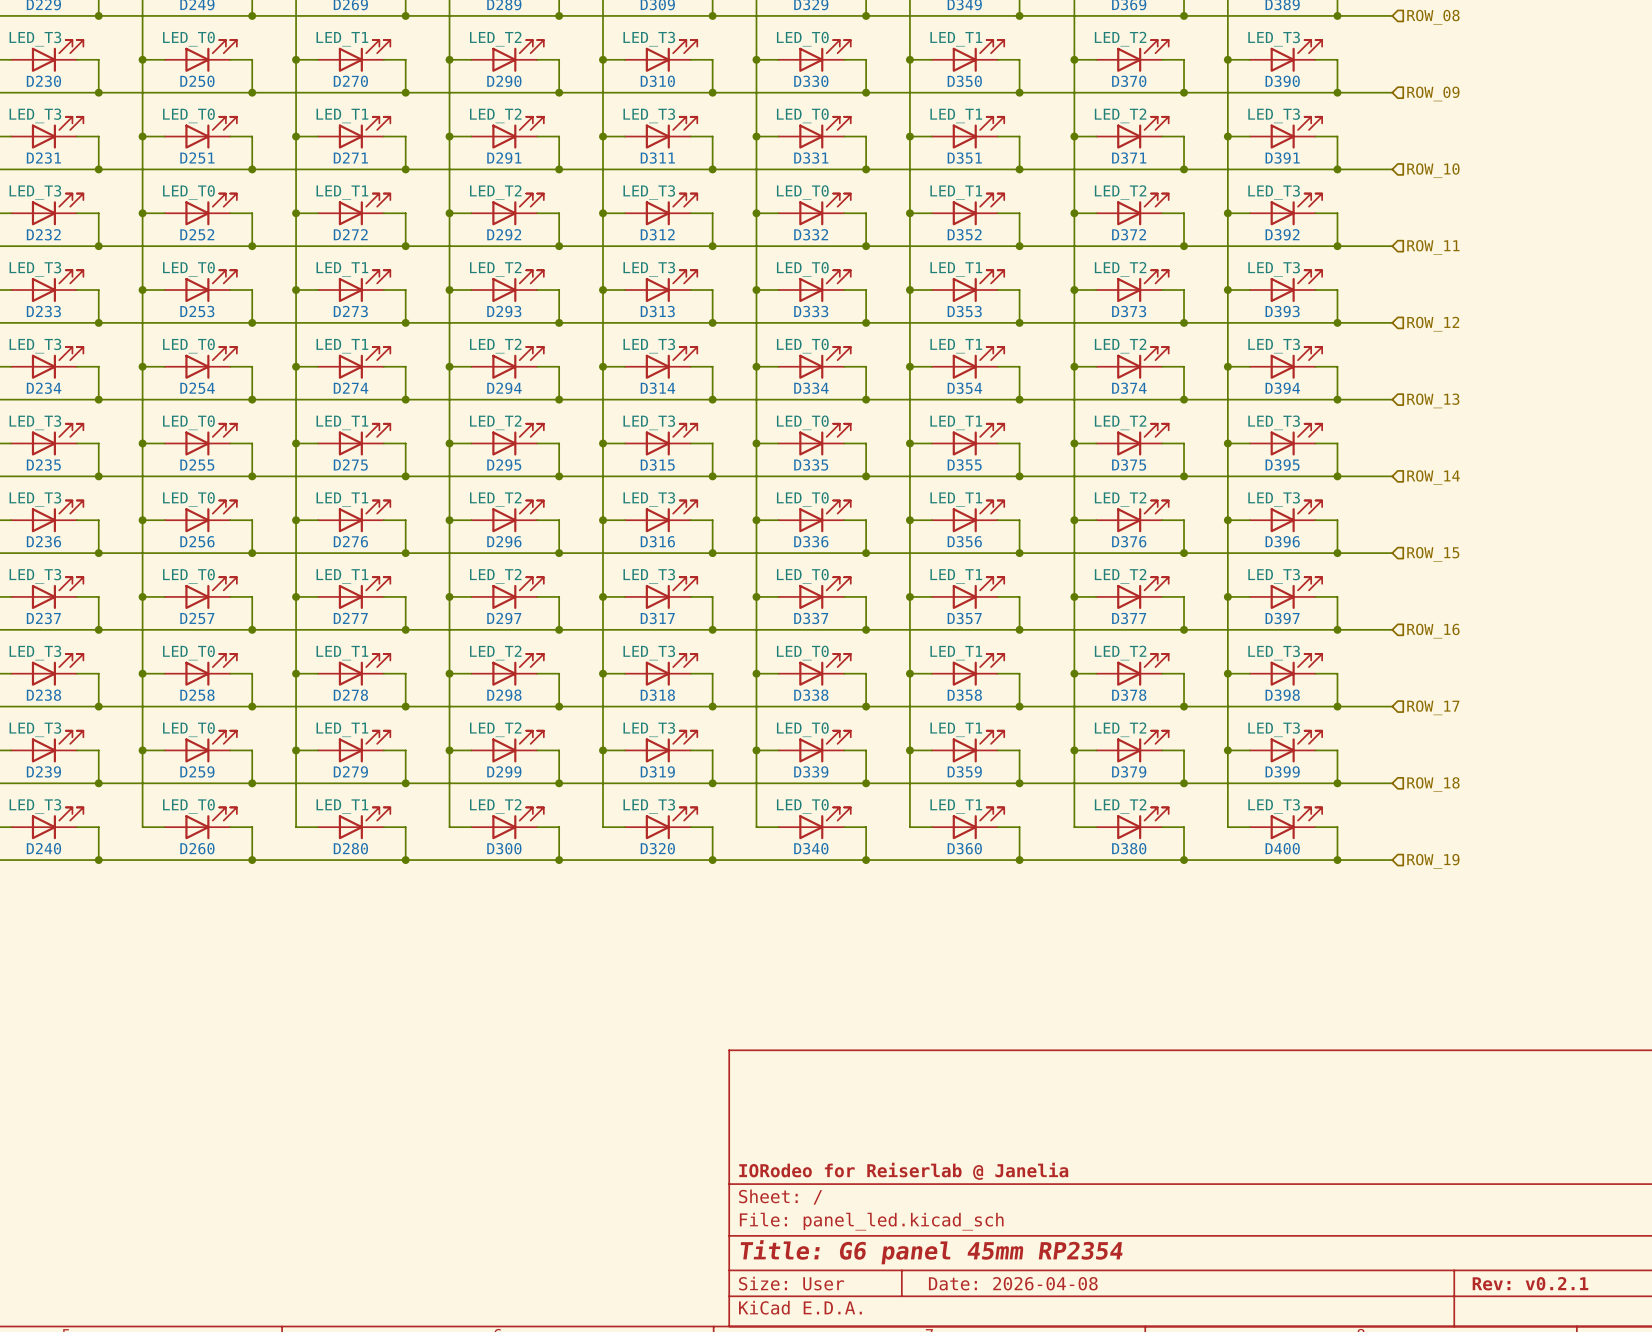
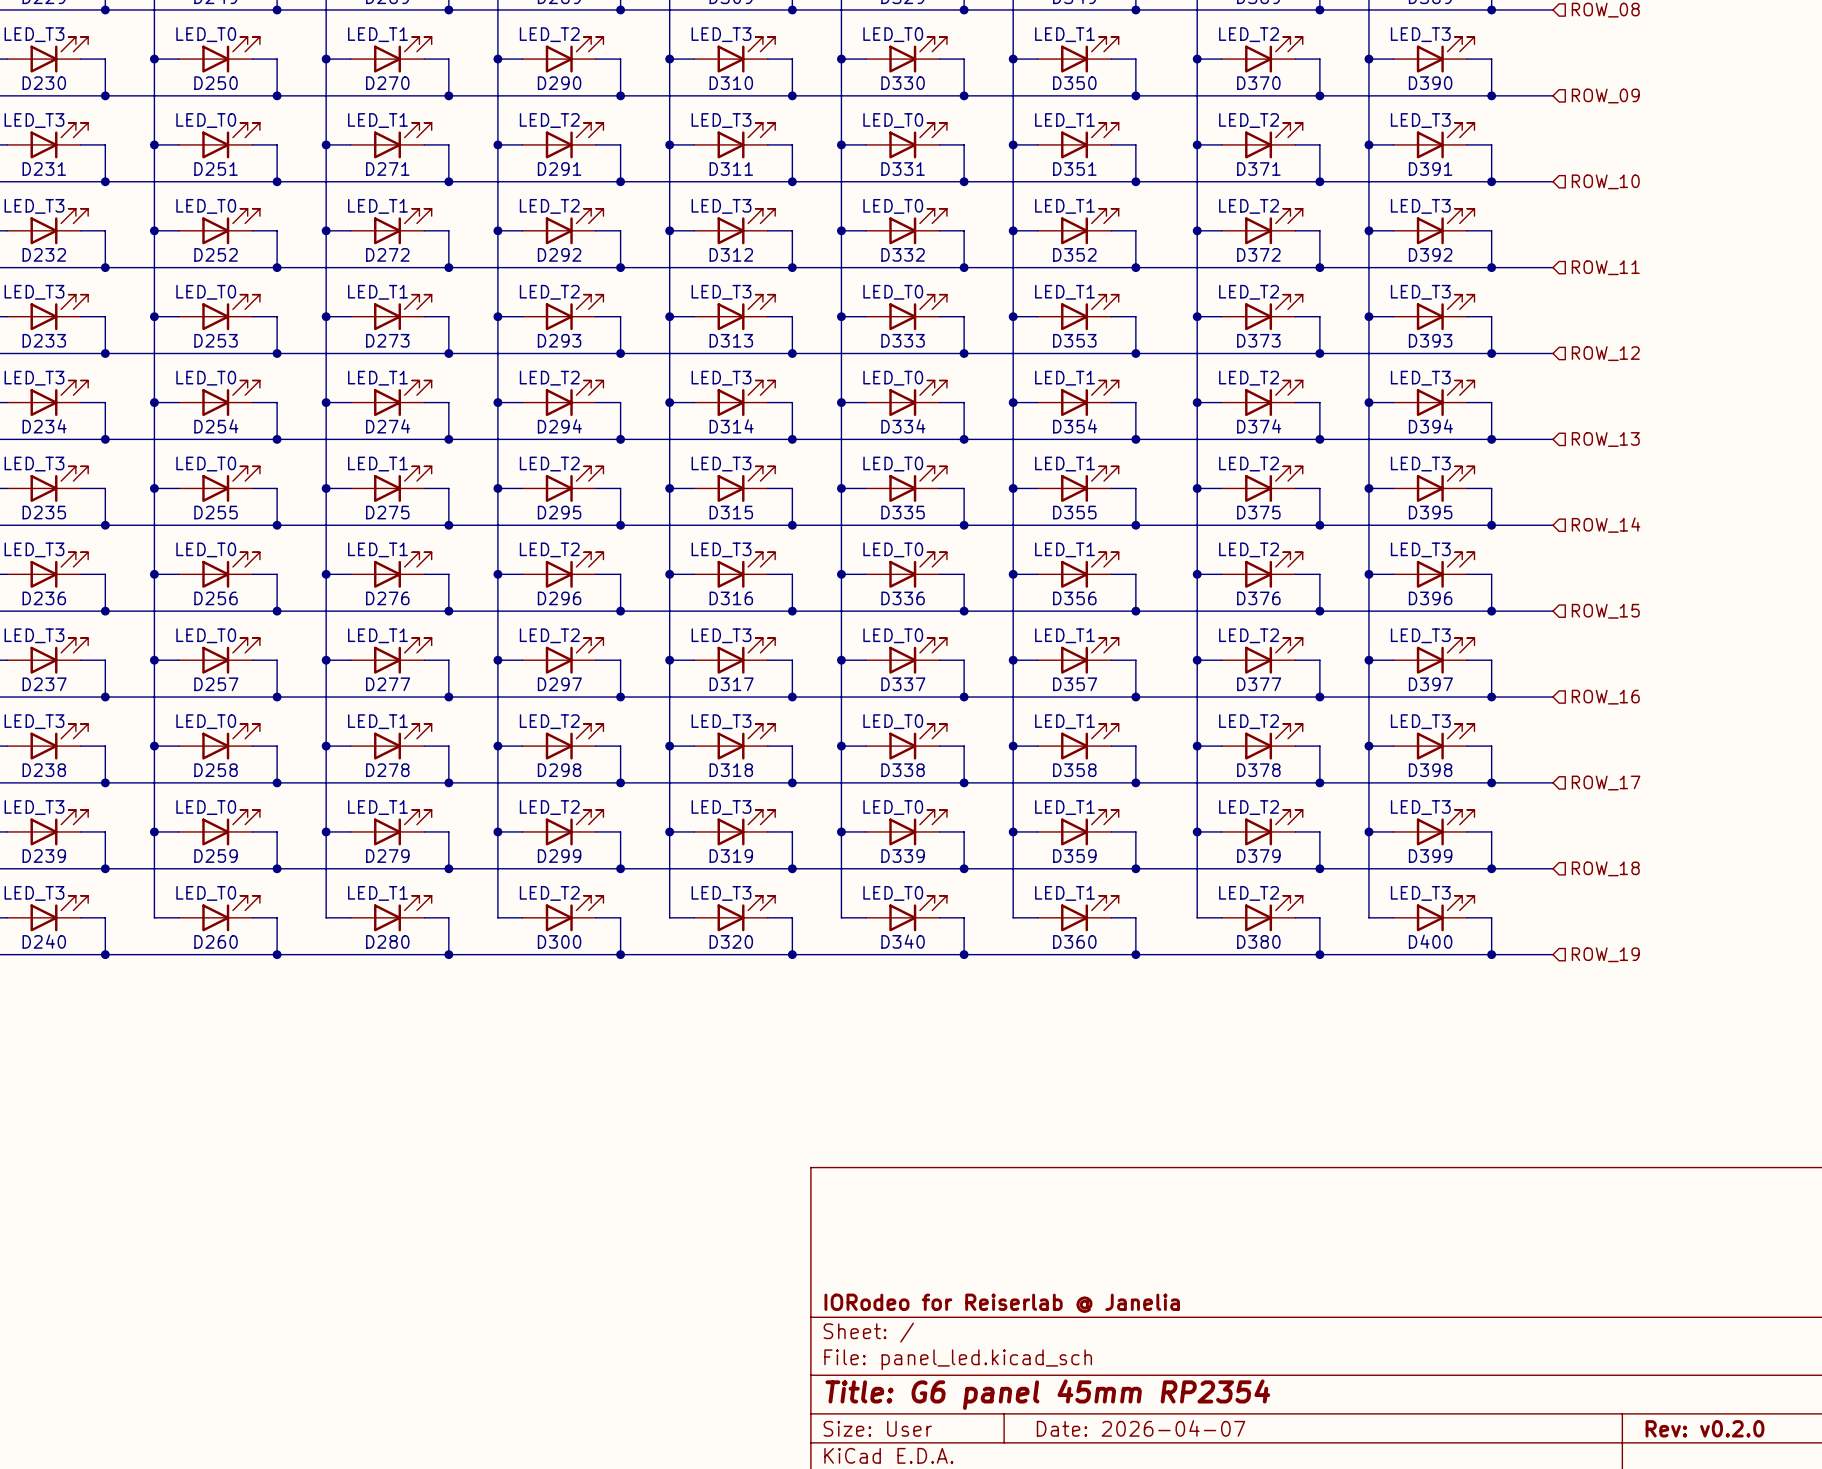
title block: Date: 2026-04-08 (1013, 1283) -> Date: 2026-04-07 (1141, 1428)
title block: Rev: v0.2.1 (1530, 1283) -> Rev: v0.2.0 (1704, 1428)

